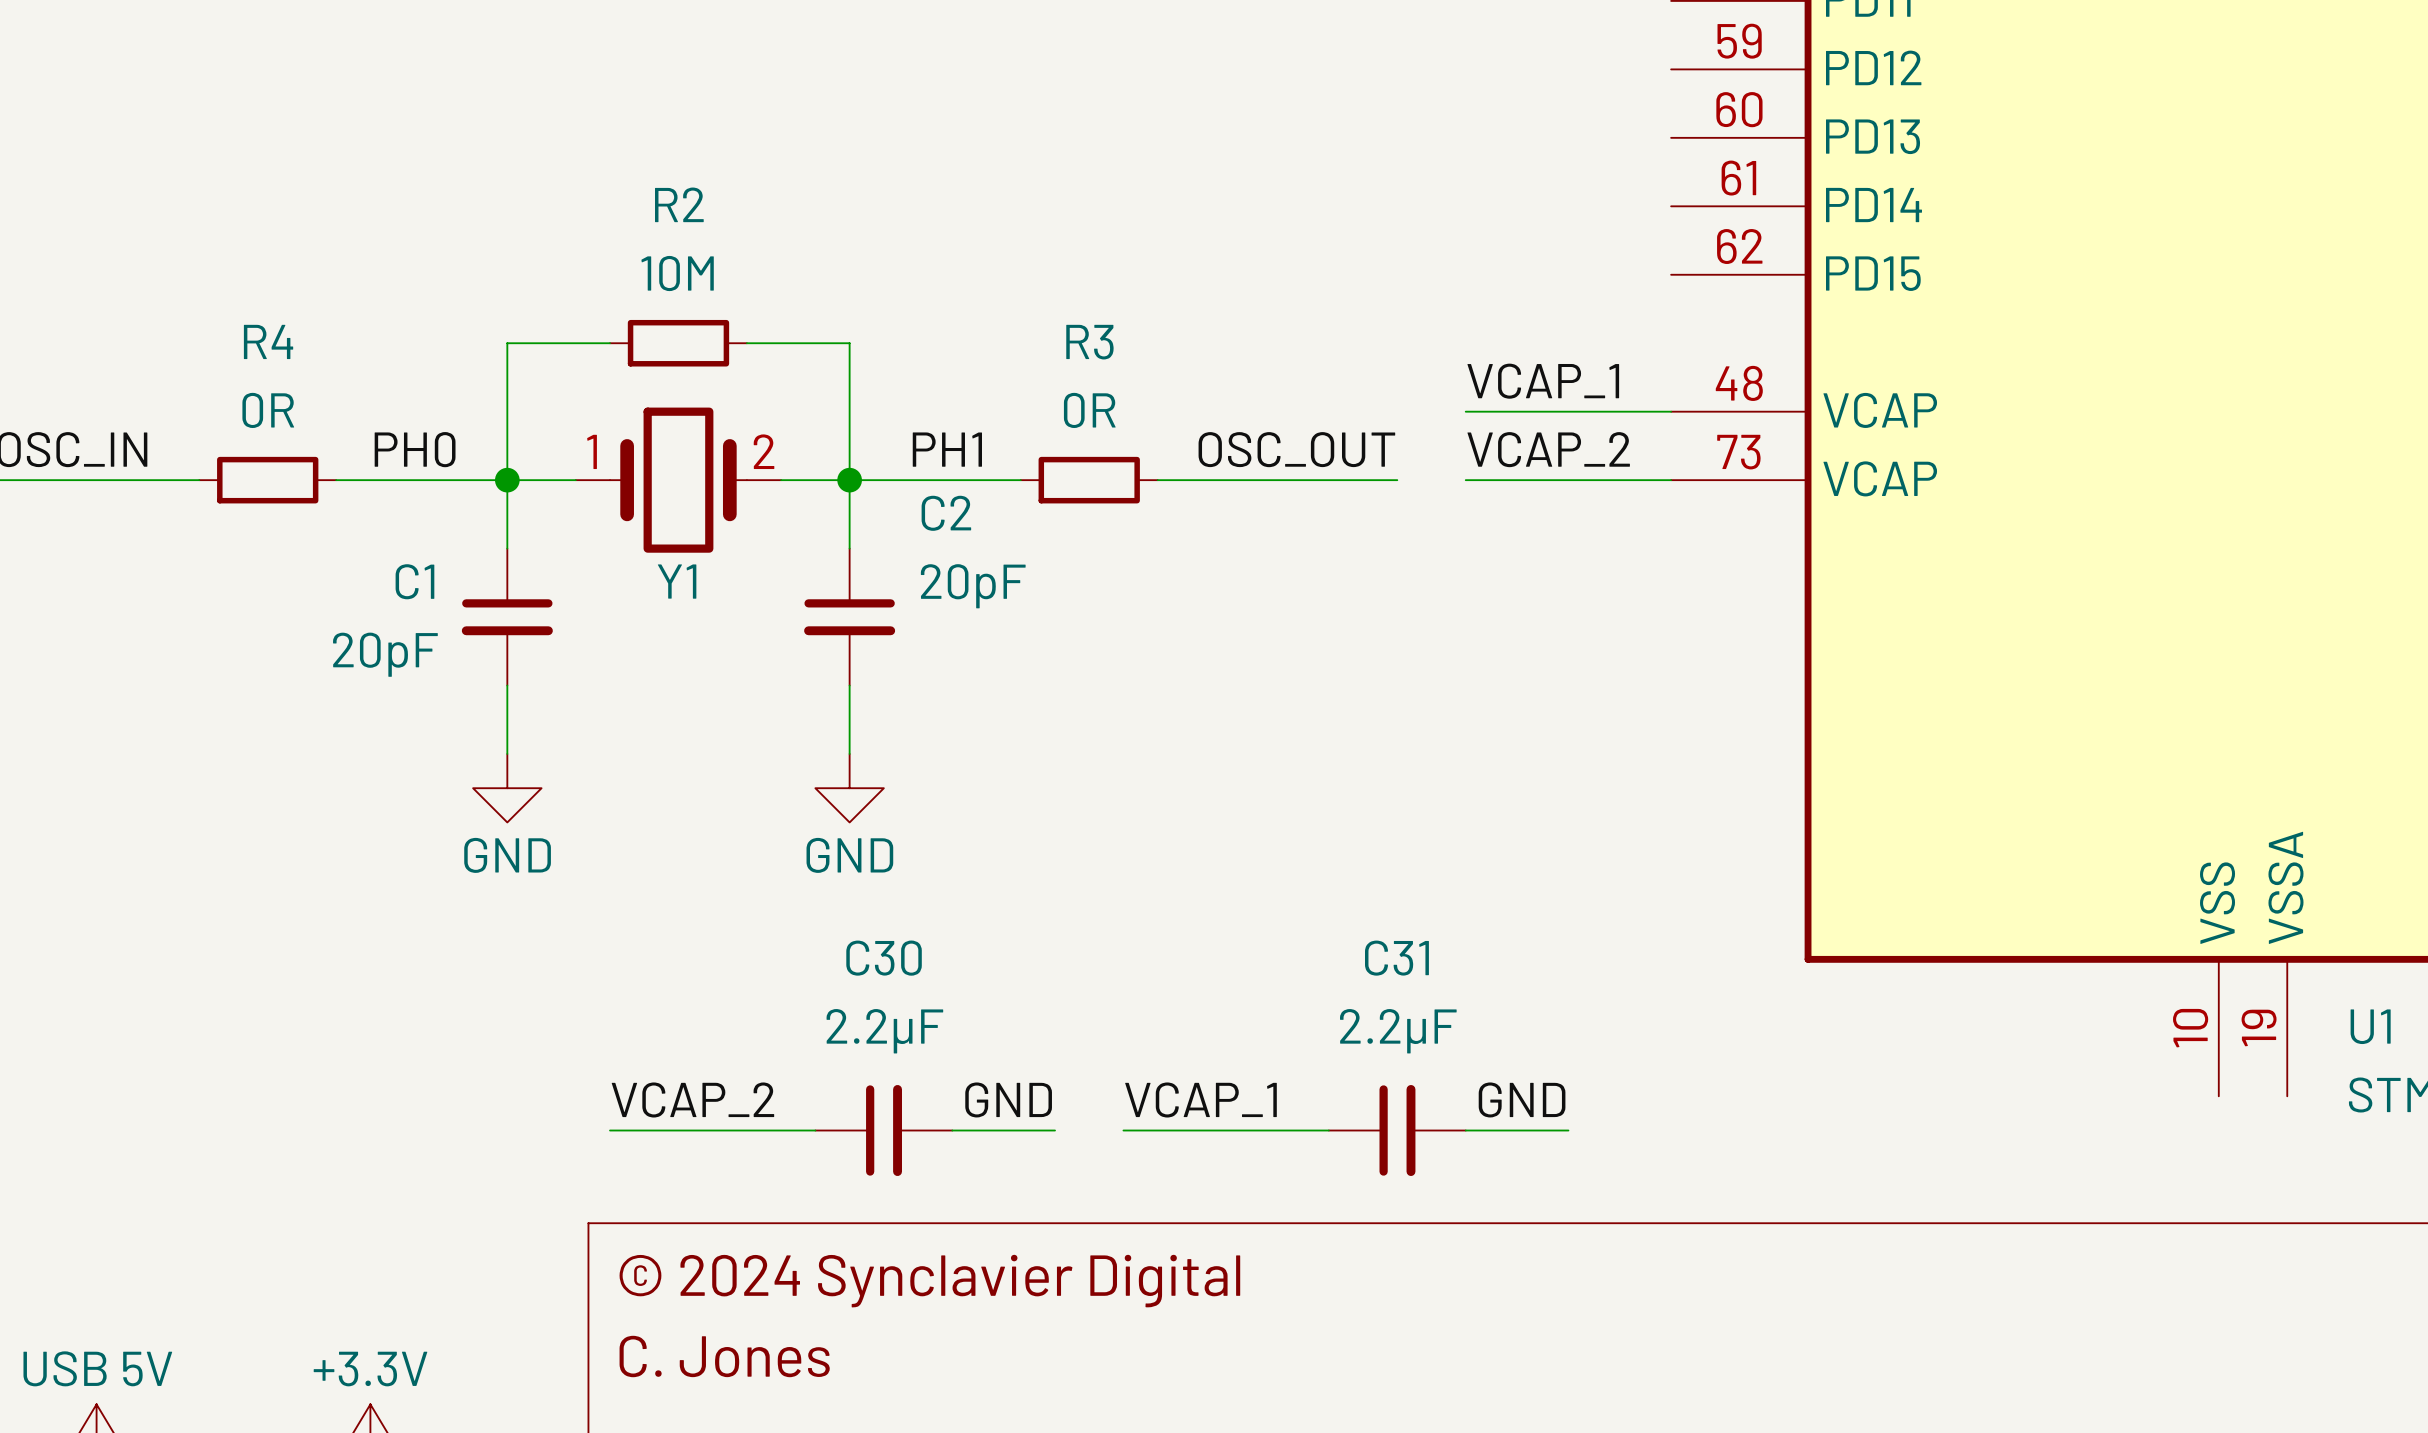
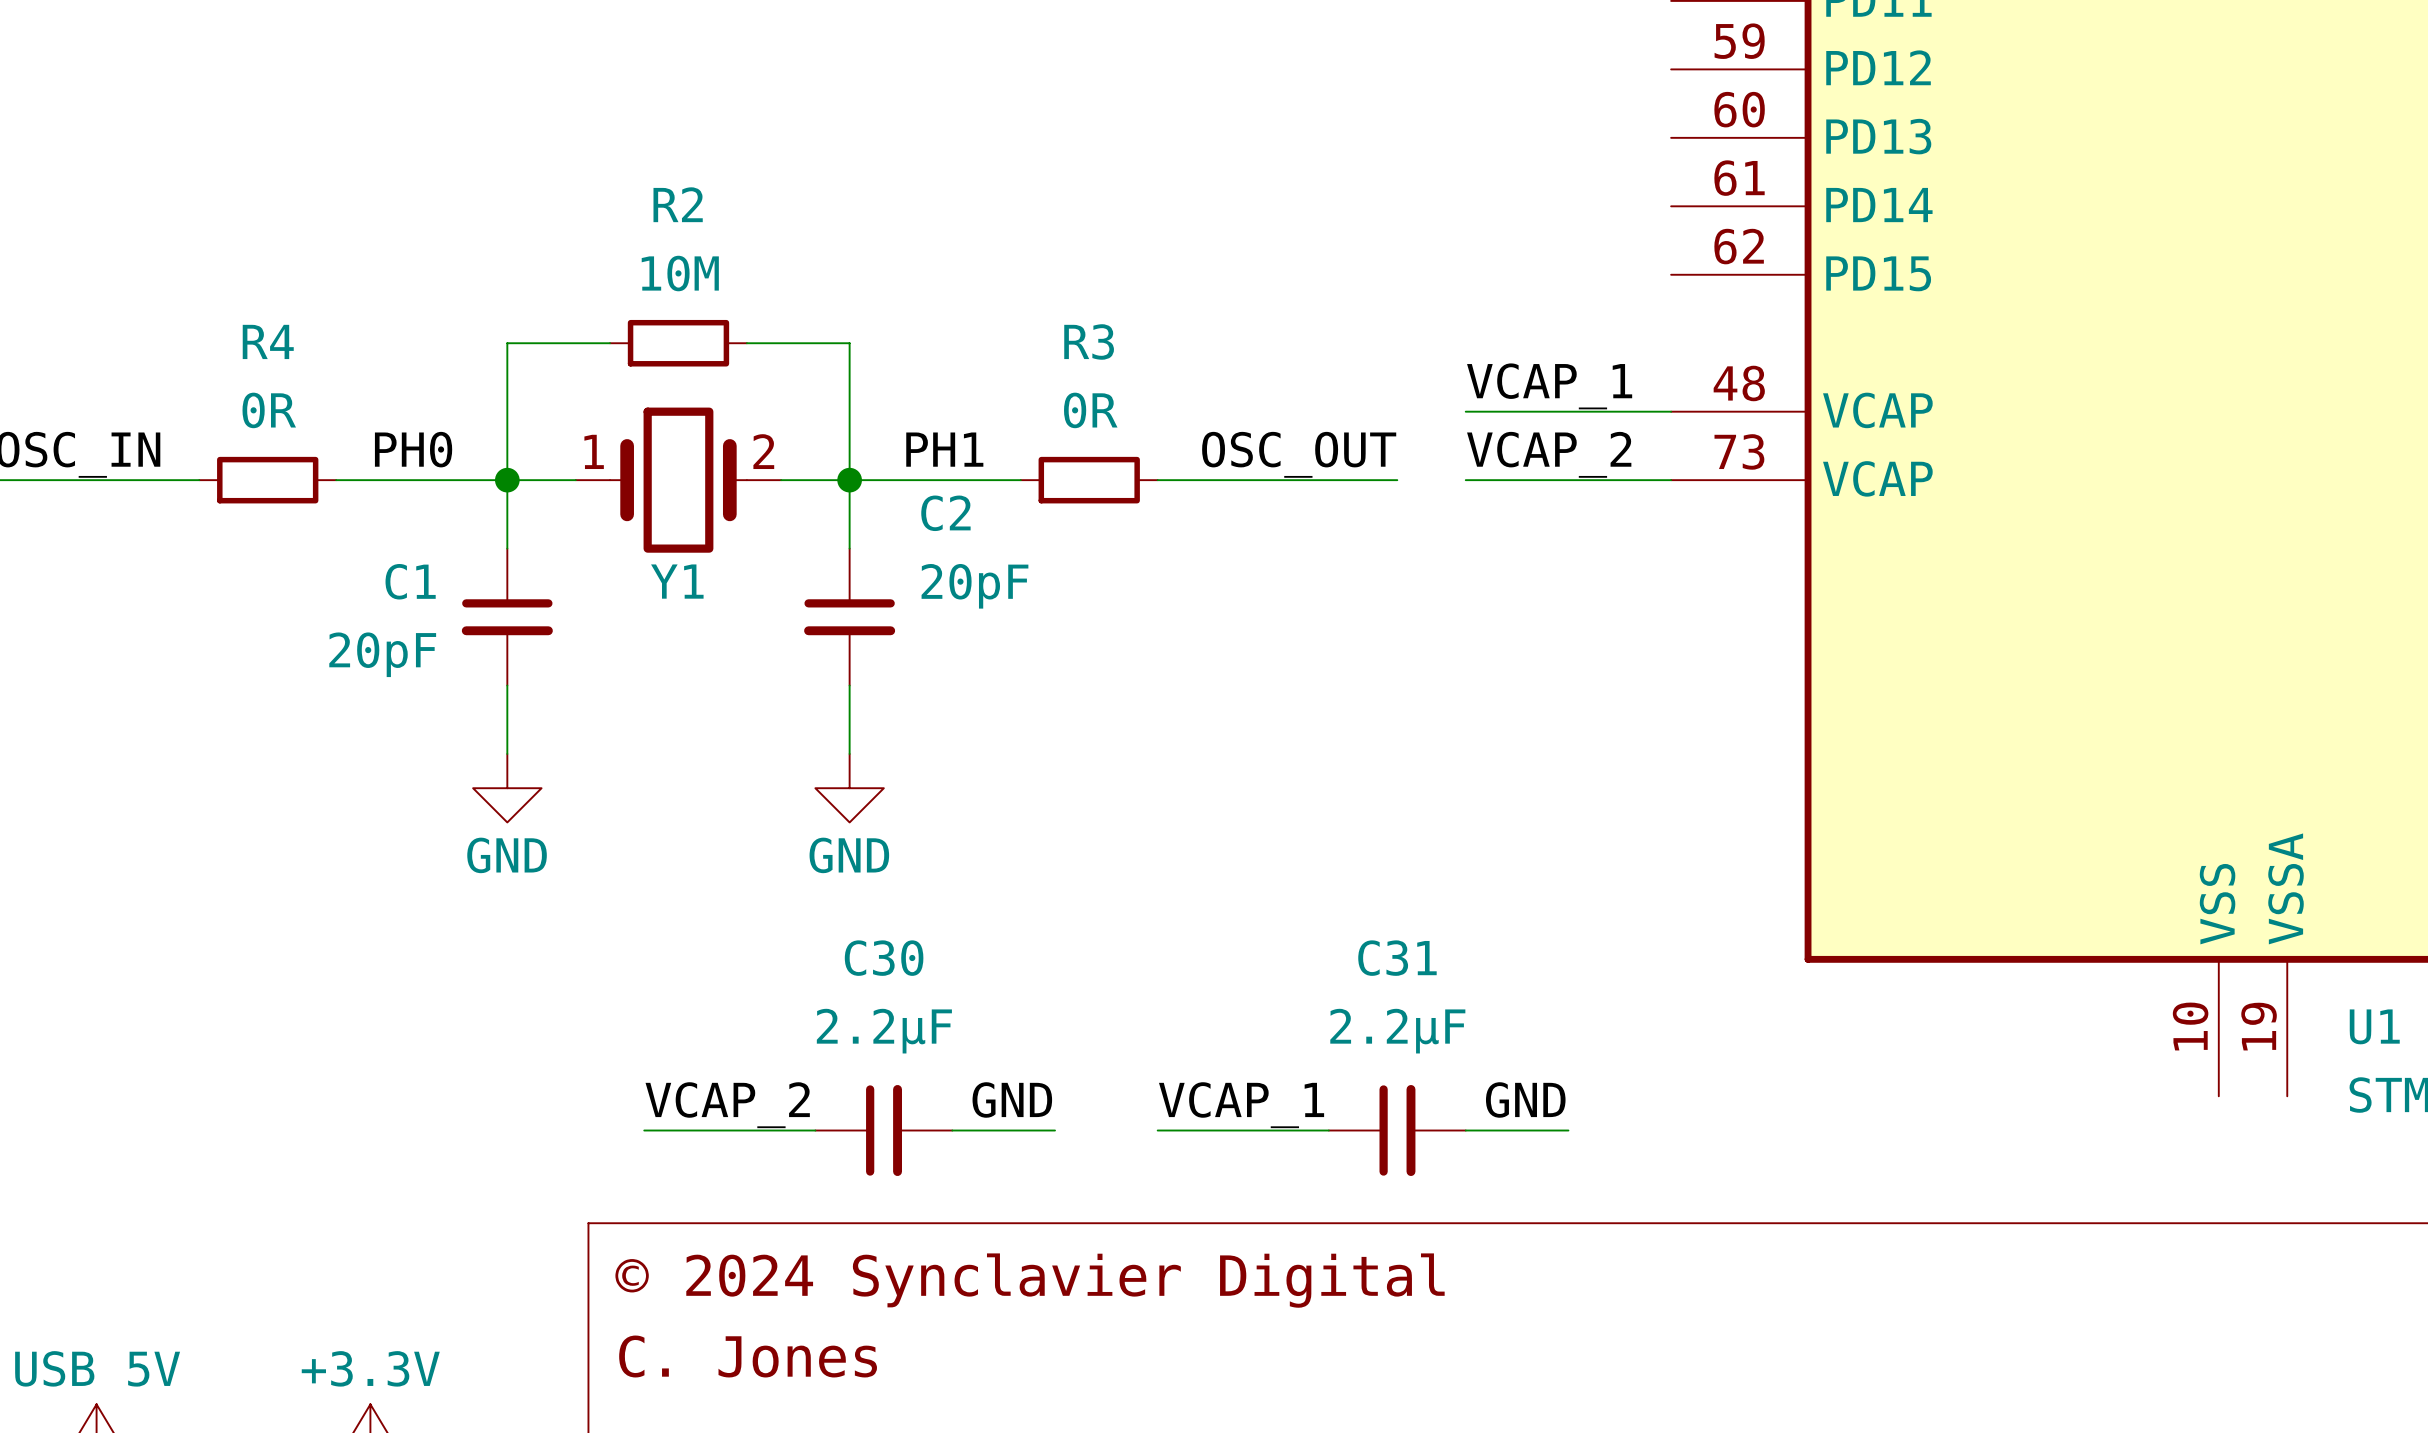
label position: VCAP_2 (692, 1099) -> VCAP_2 (727, 1105)
label position: VCAP_1 (1200, 1099) -> VCAP_1 (1241, 1105)
wire: (610, 1130) (644, 1130) -> none
wire: (1123, 1130) (1157, 1130) -> none

